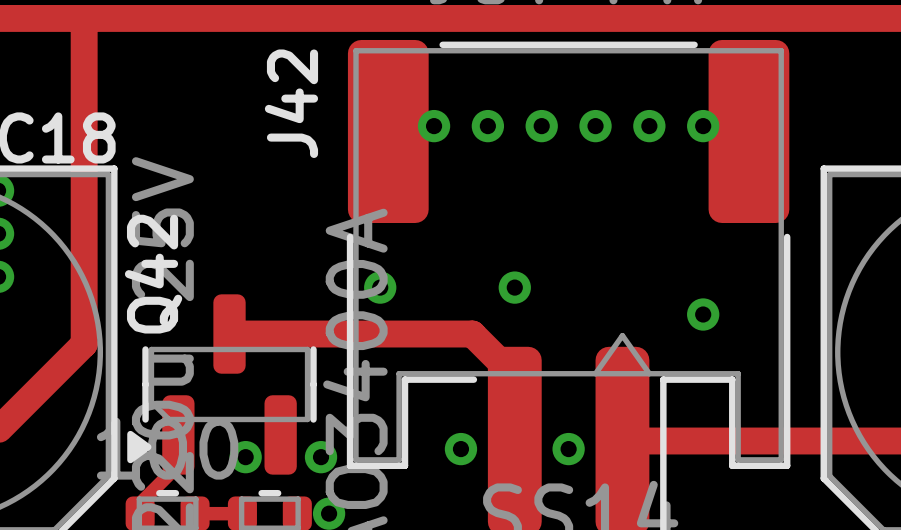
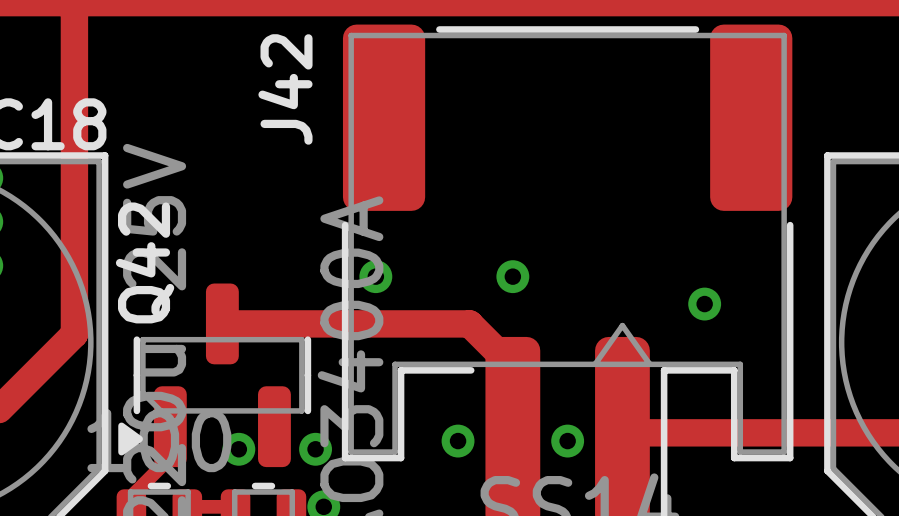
via: (434, 126) -> none
via: (487, 126) -> none
via: (541, 126) -> none
via: (595, 126) -> none
via: (649, 126) -> none
via: (703, 126) -> none

